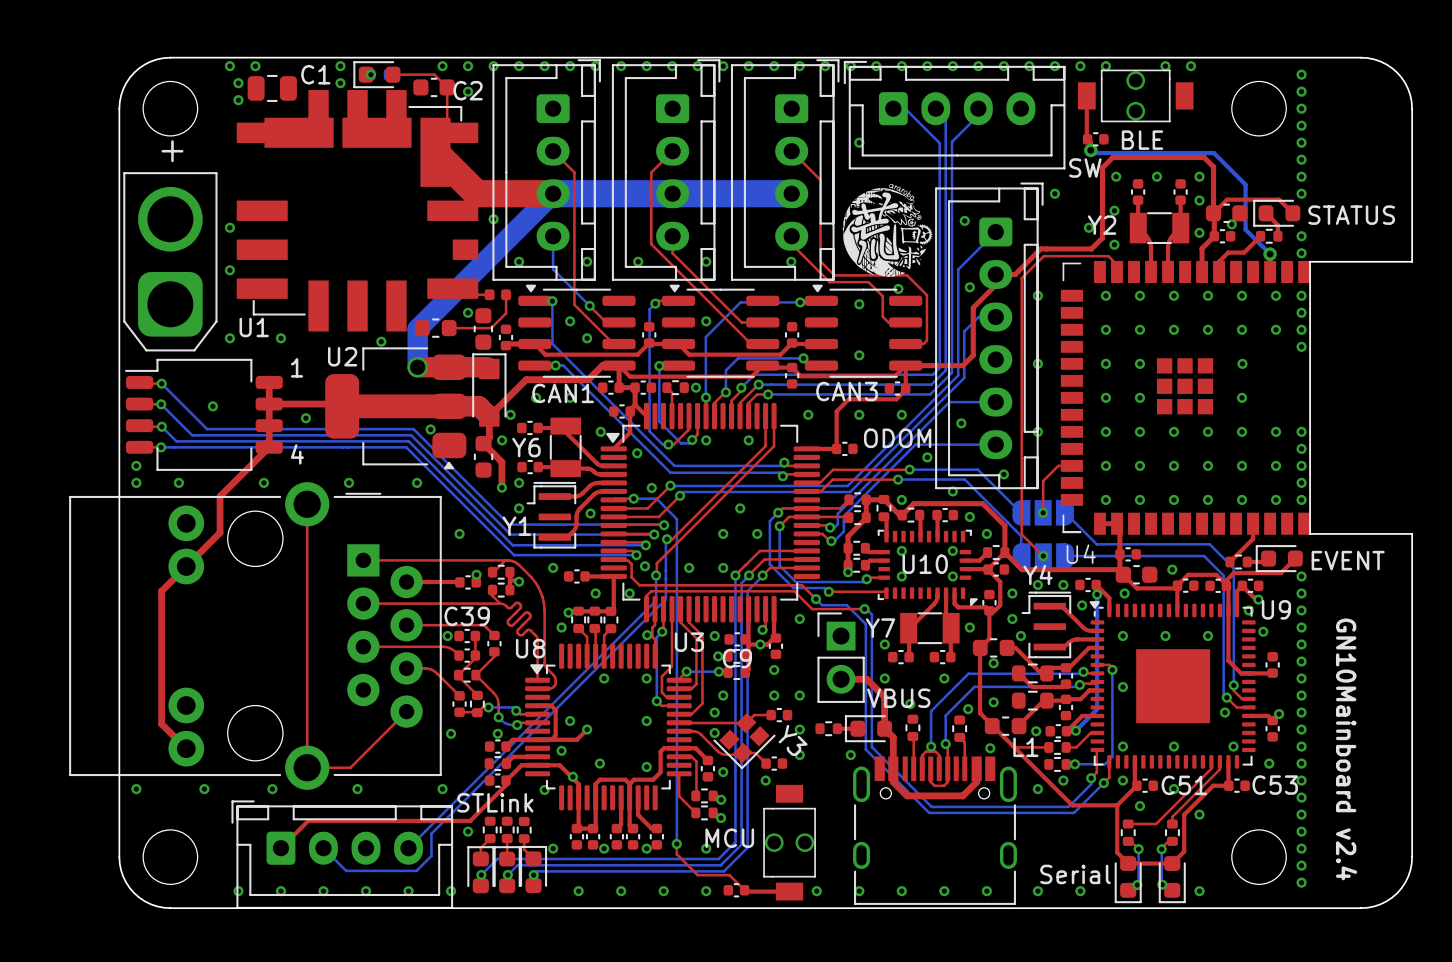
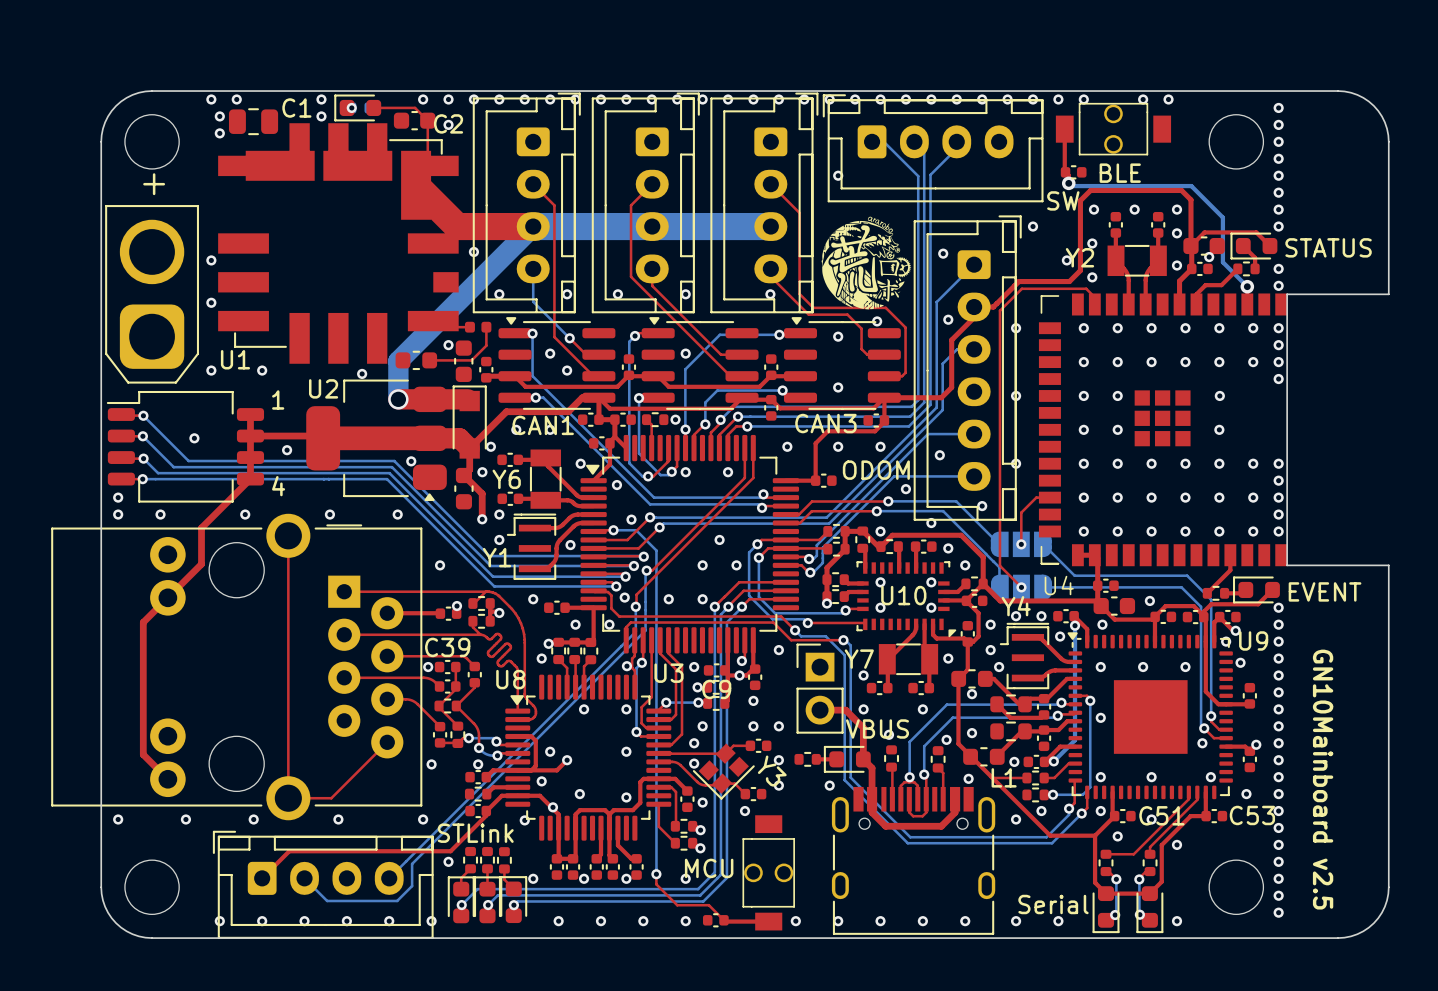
text: GN10Mainboard v2.4 (1346, 749) -> GN10Mainboard v2.5 (1323, 779)

